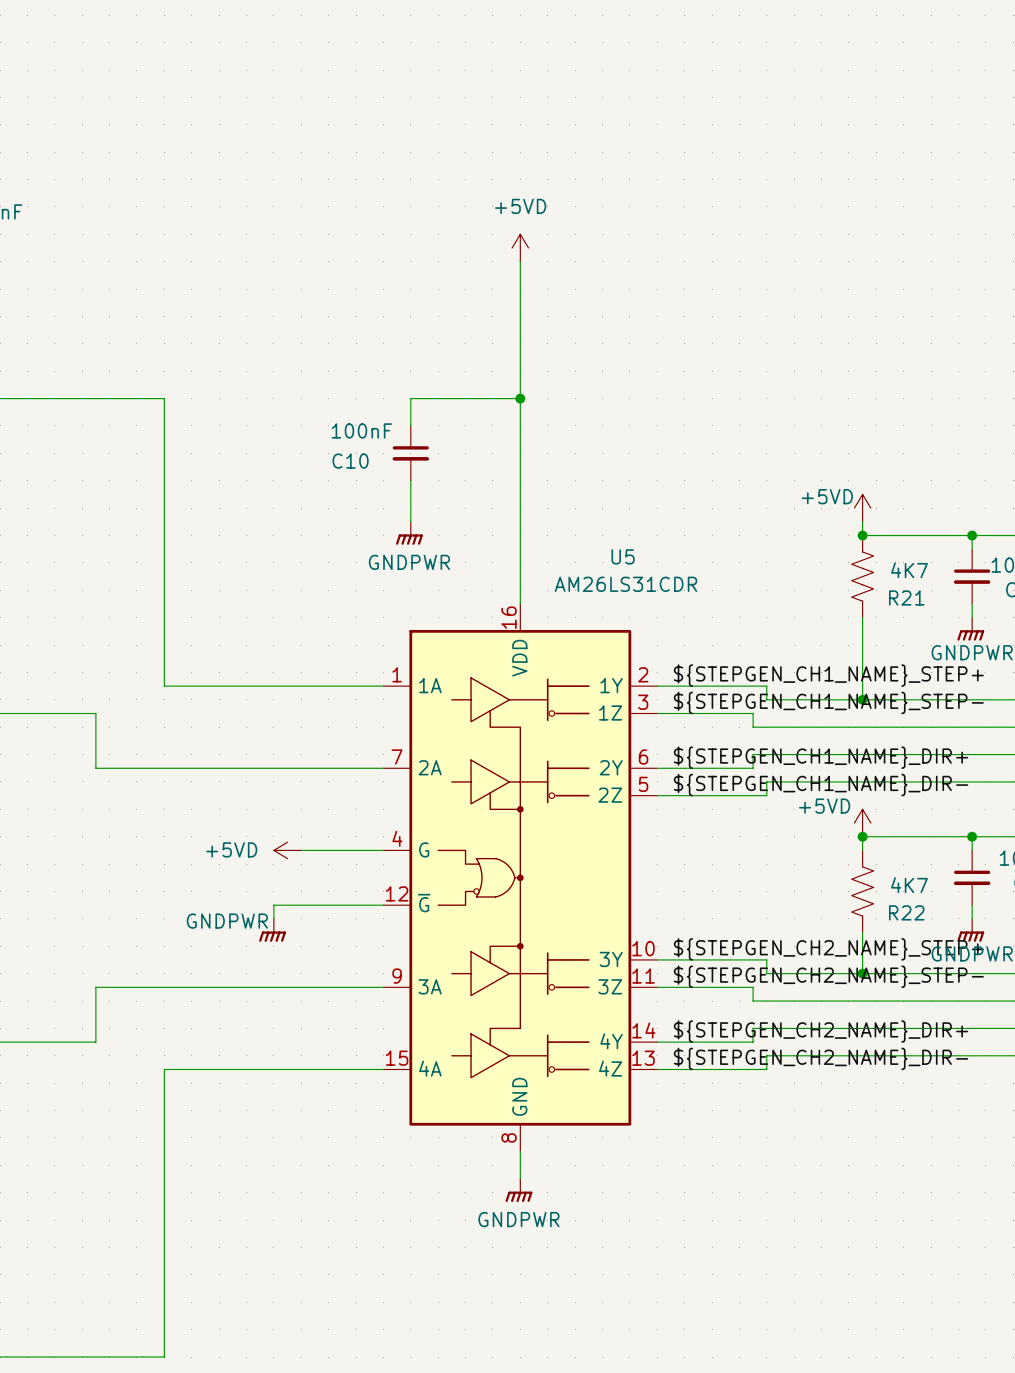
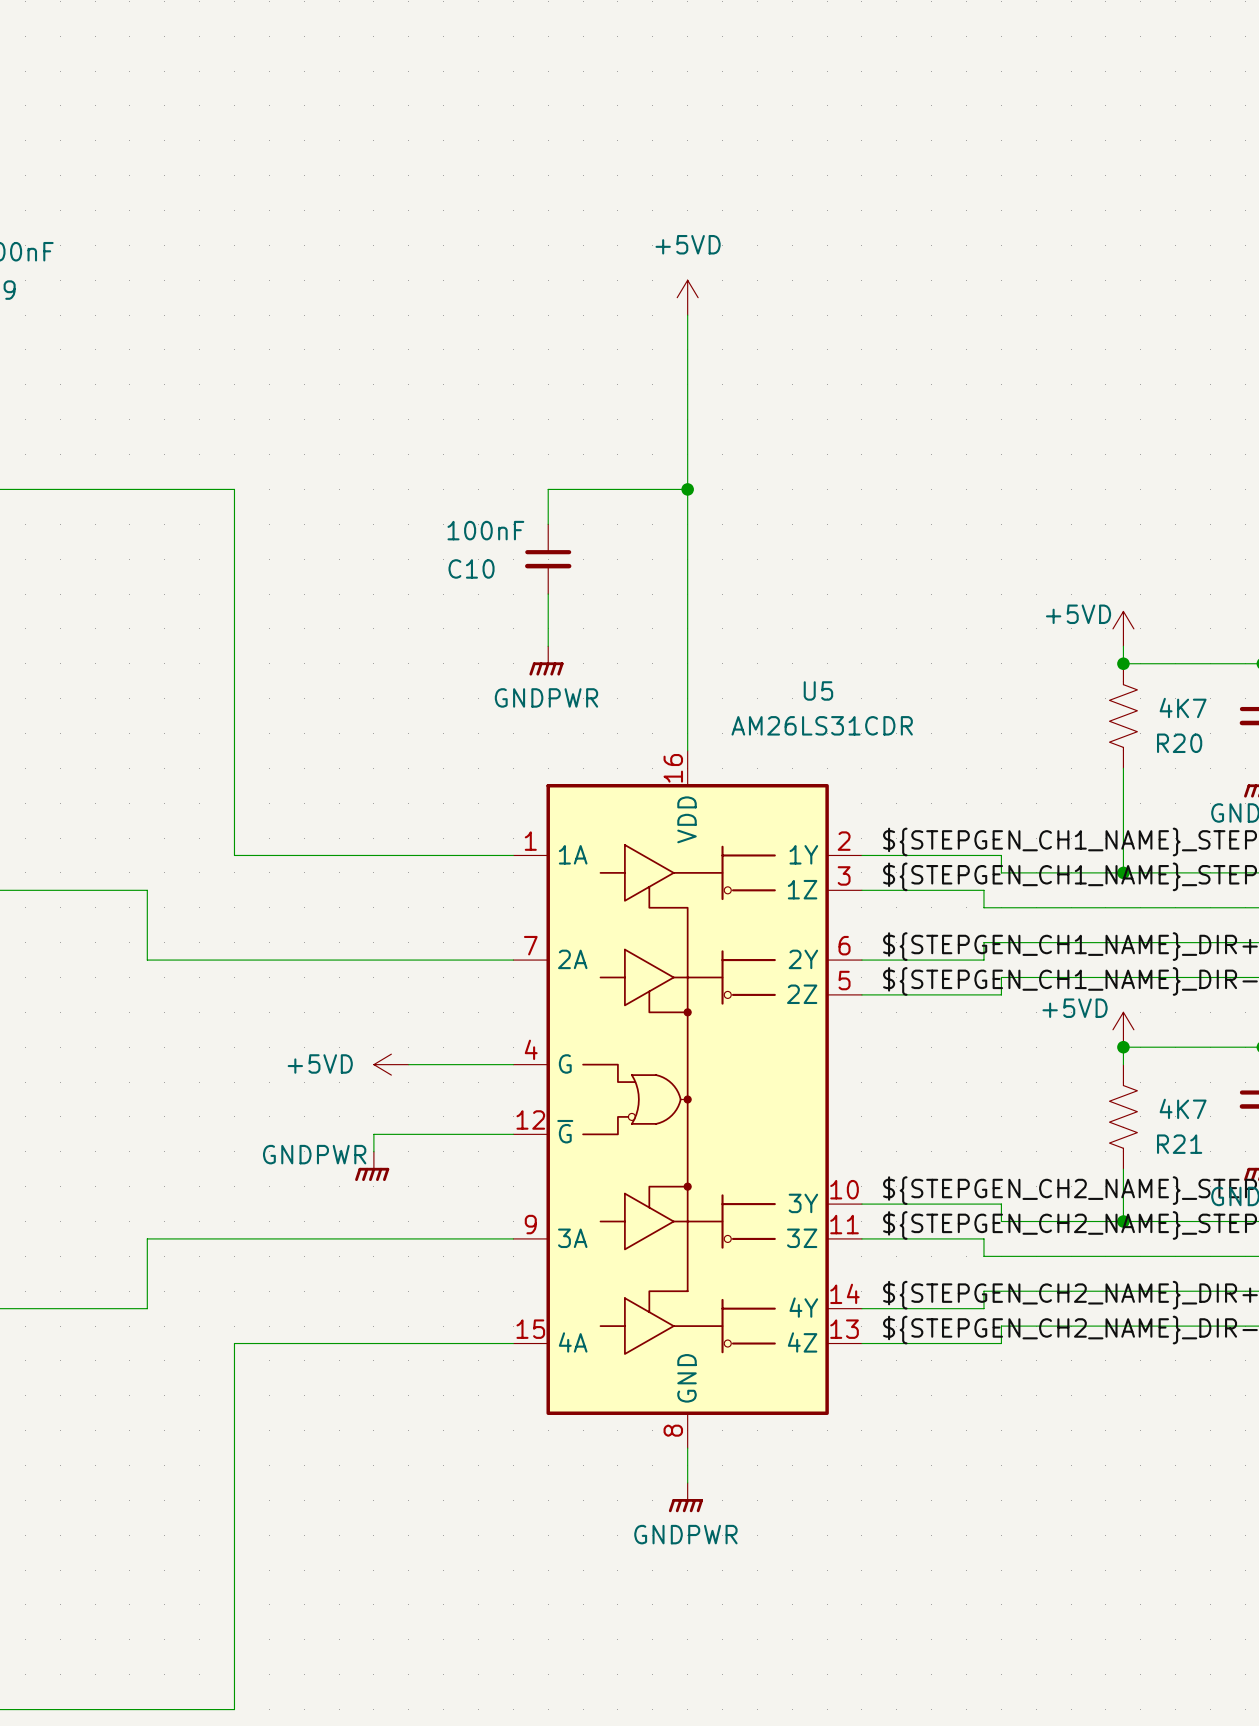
R21 name: R21 (906, 597) -> R20 (1179, 743)
R22 name: R22 (906, 912) -> R21 (1179, 1144)

